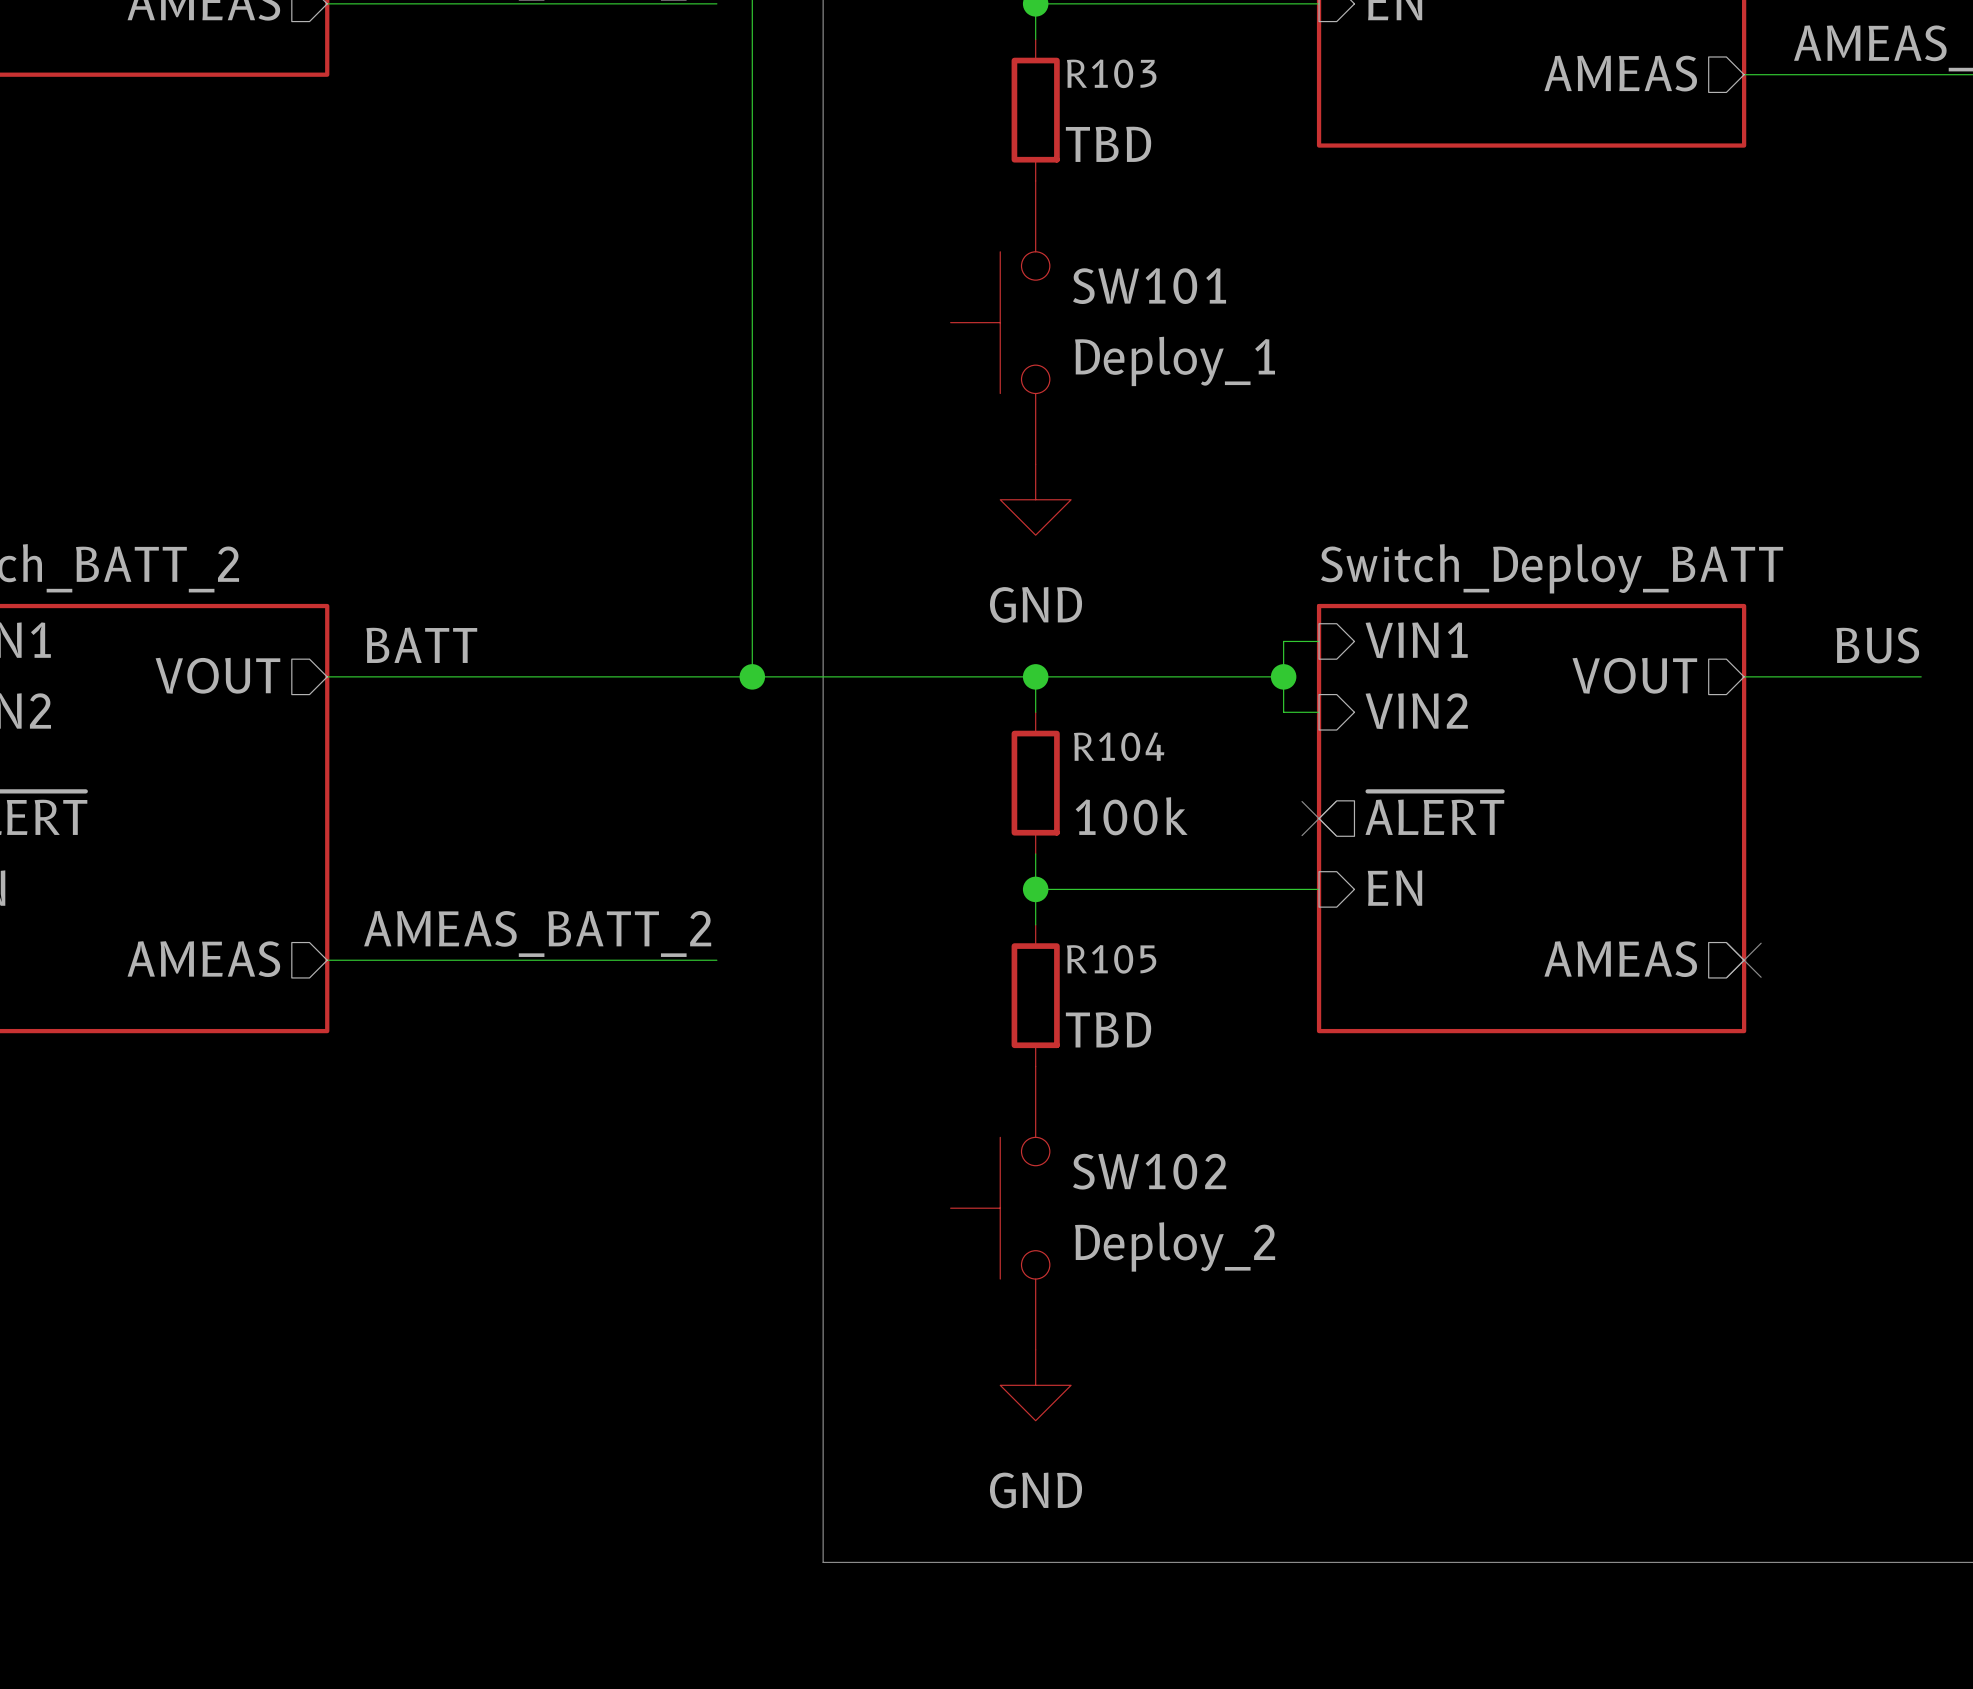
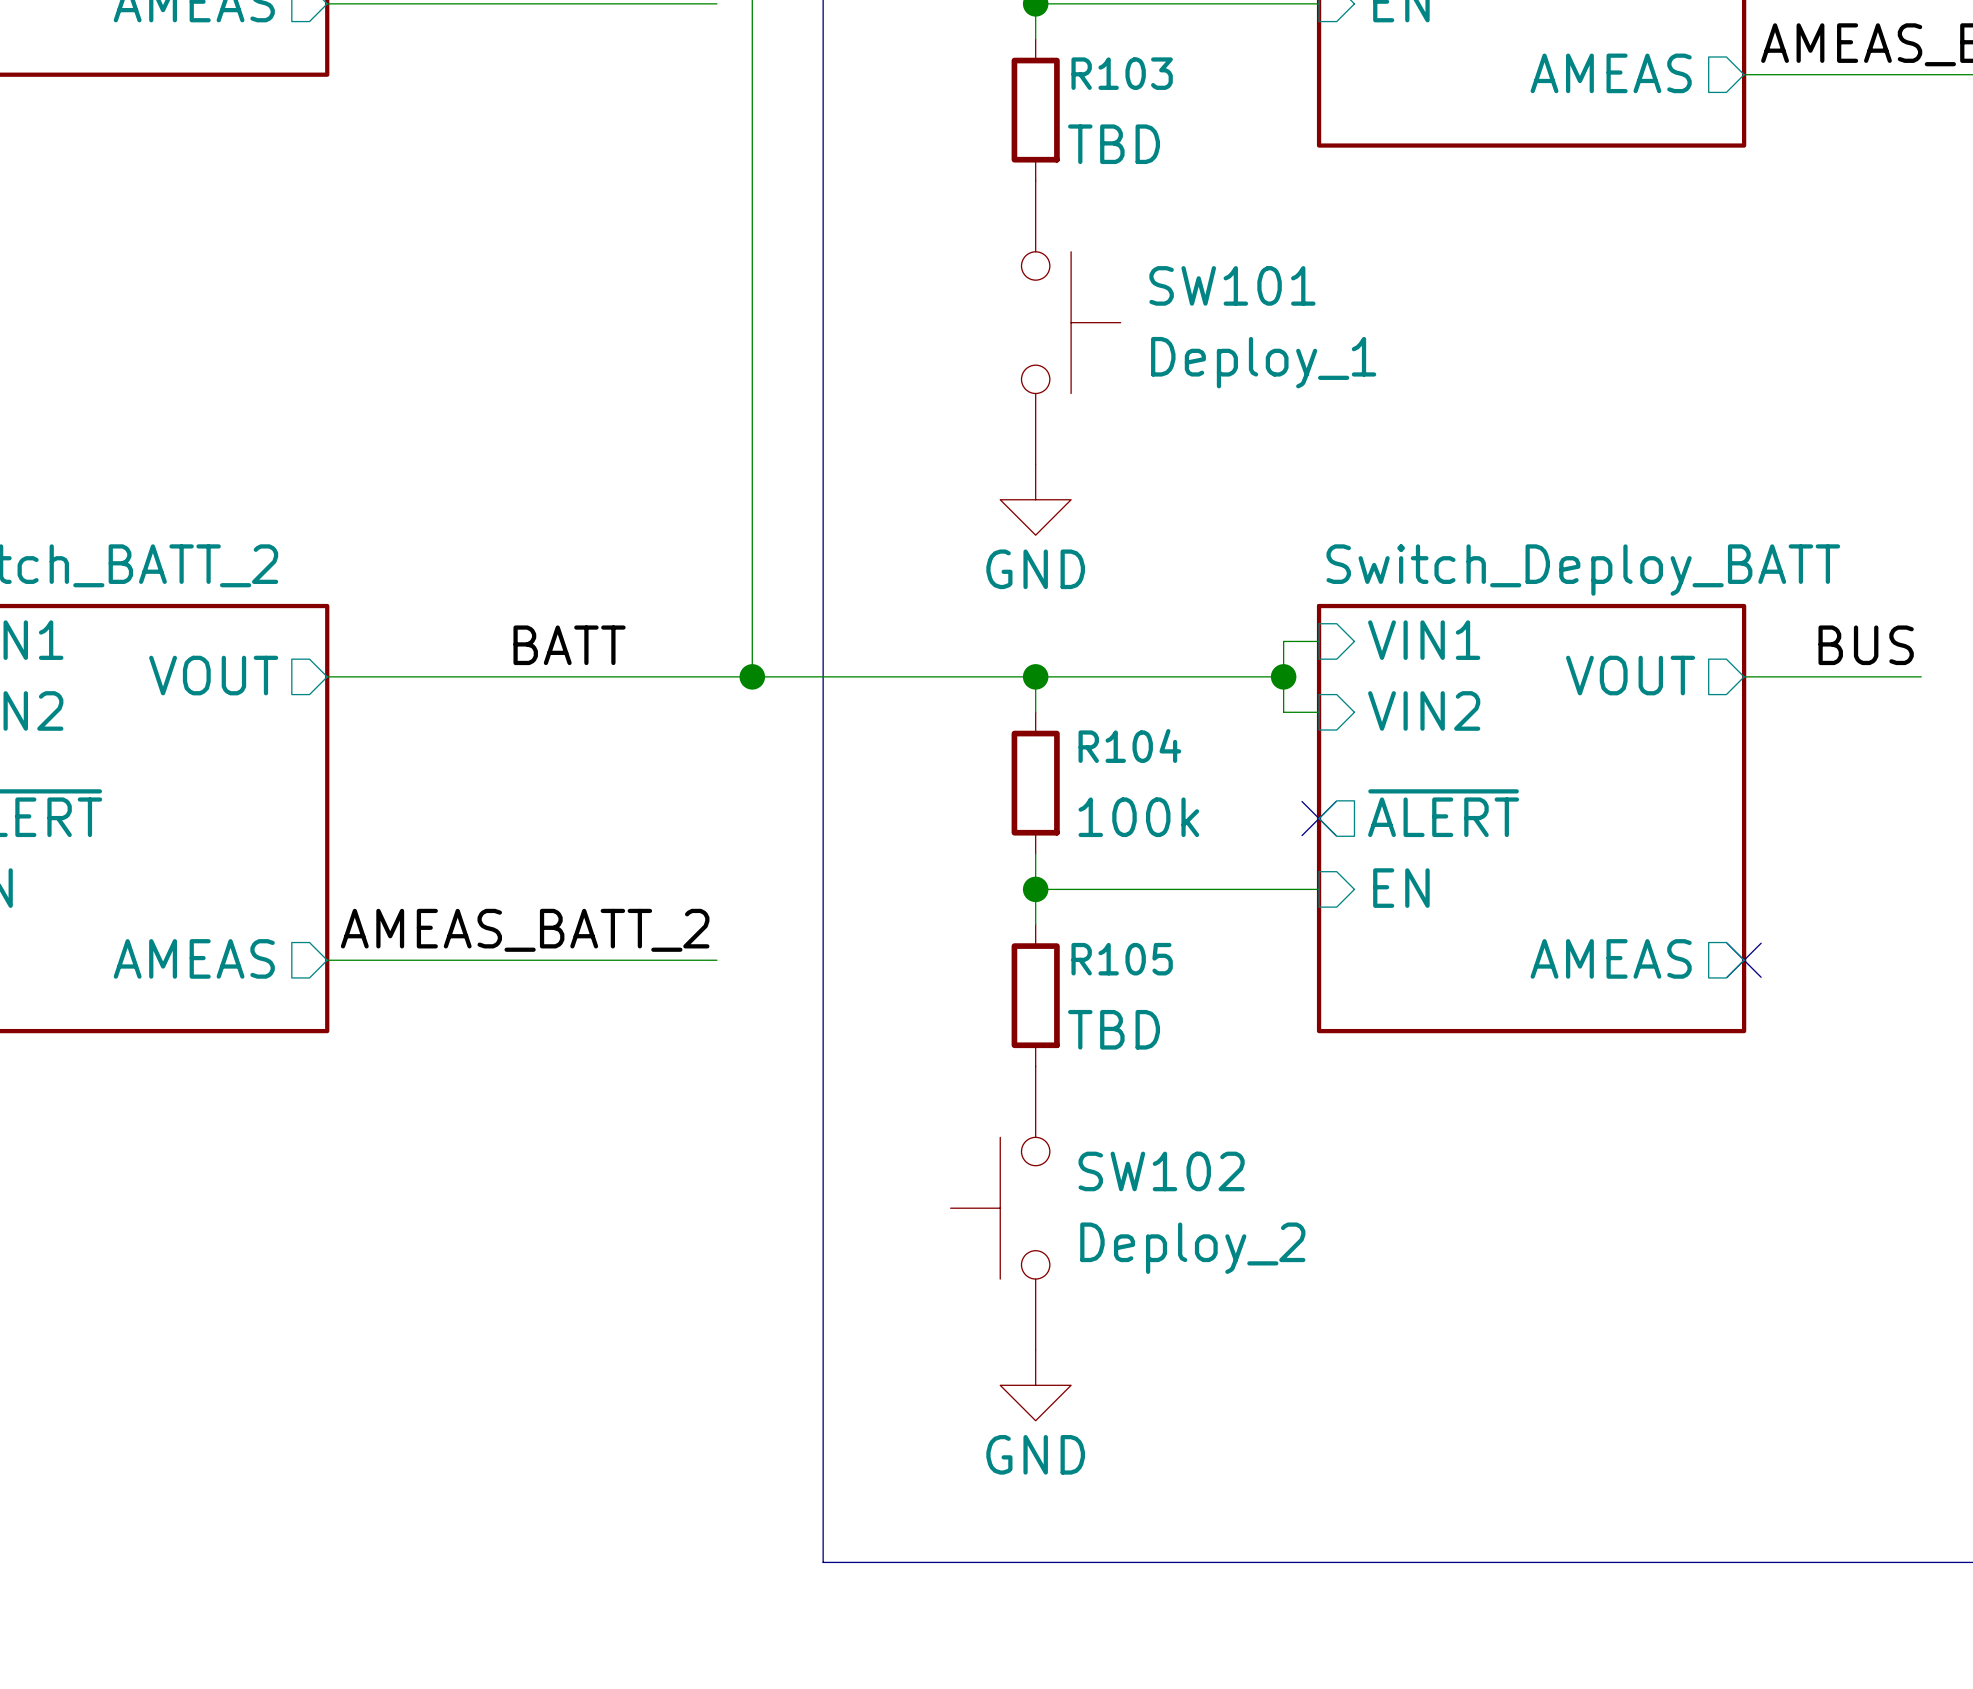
SW101 rotation: 0° (1000, 322) -> 180° (1071, 322)
power symbol text position: GND (1036, 604) -> GND (1035, 569)
label position: BATT (421, 645) -> BATT (569, 645)
power symbol text position: GND (1036, 1490) -> GND (1035, 1454)

